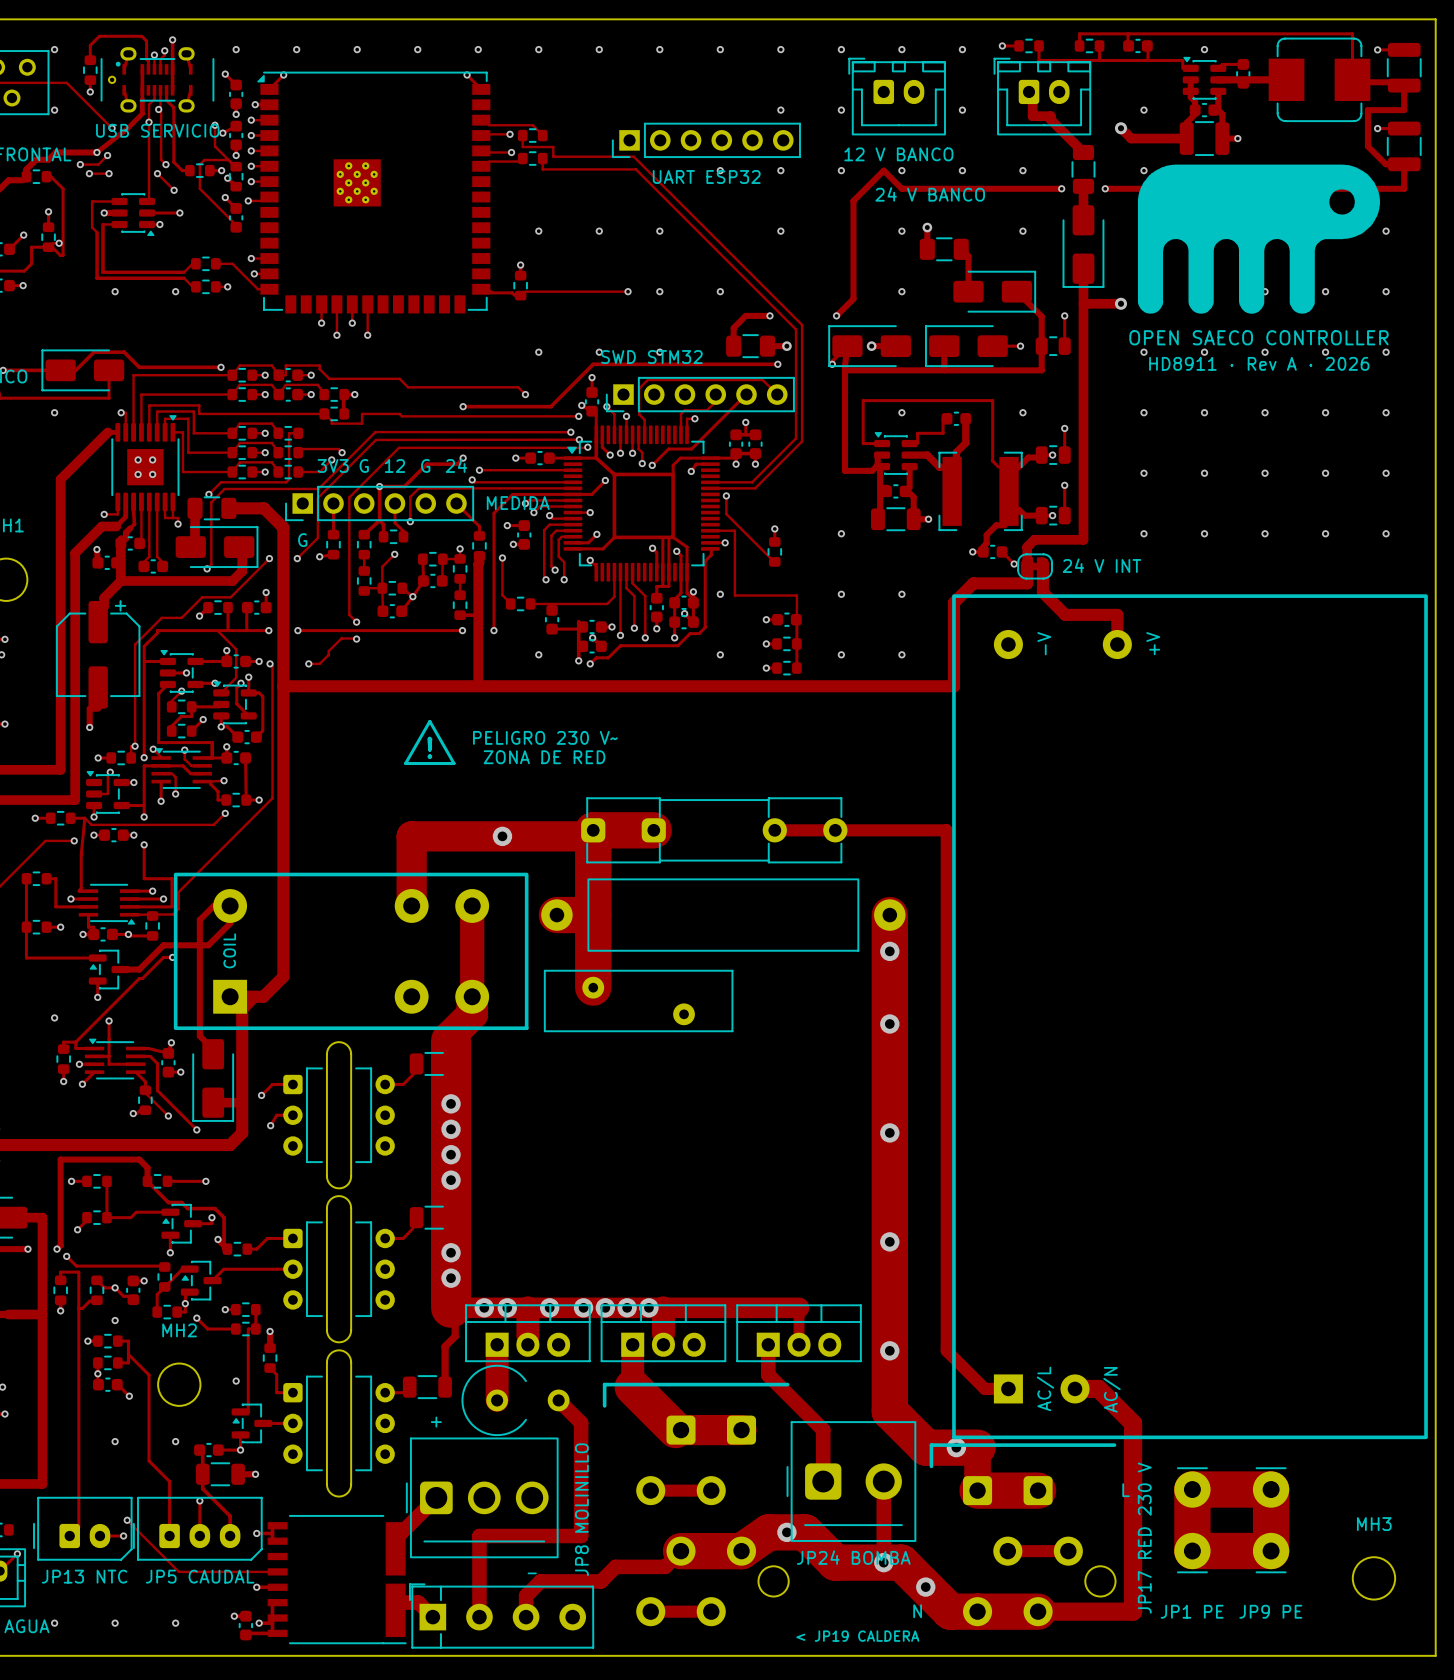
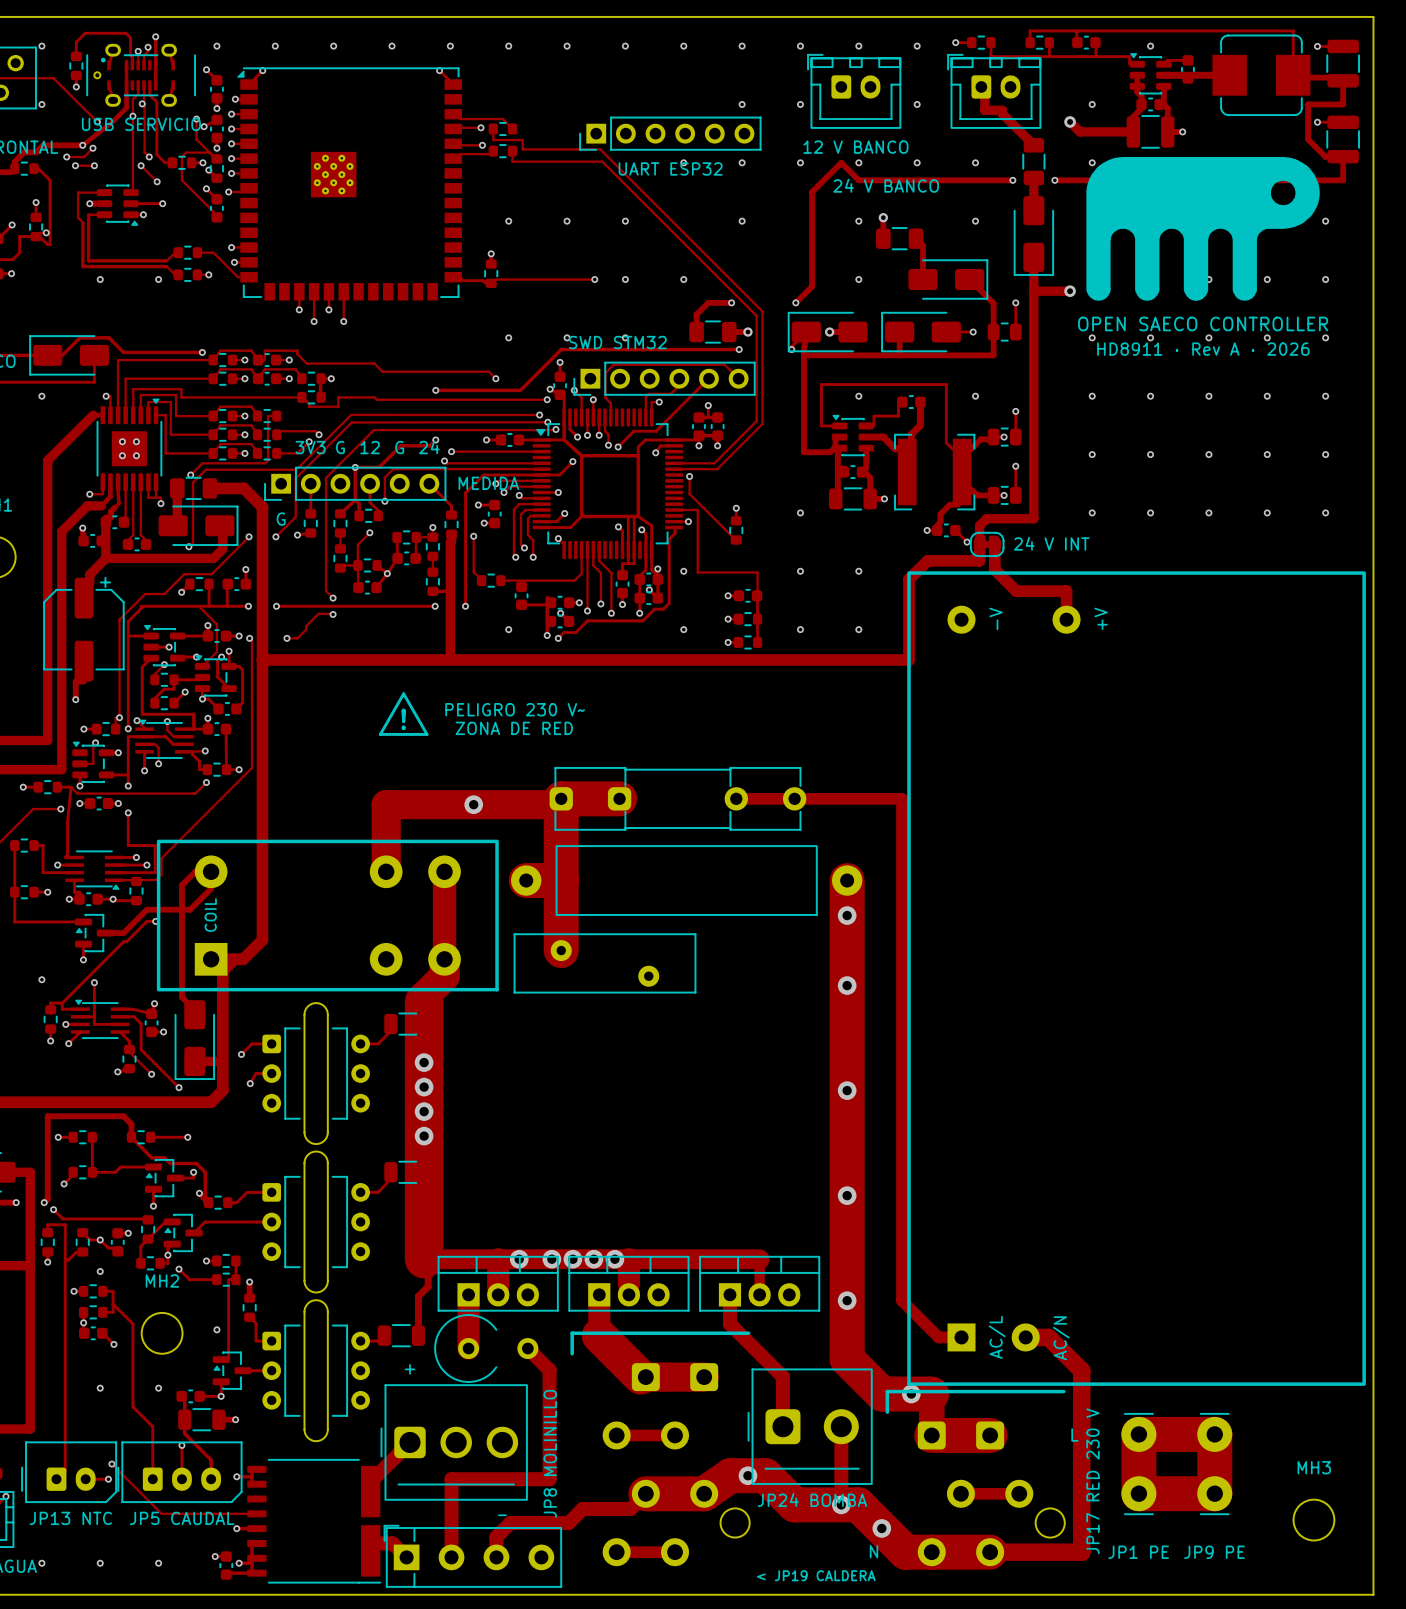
via: (451, 1252) -> none
via: (451, 1278) -> none
via: (484, 1307) -> none
via: (507, 1307) -> none

